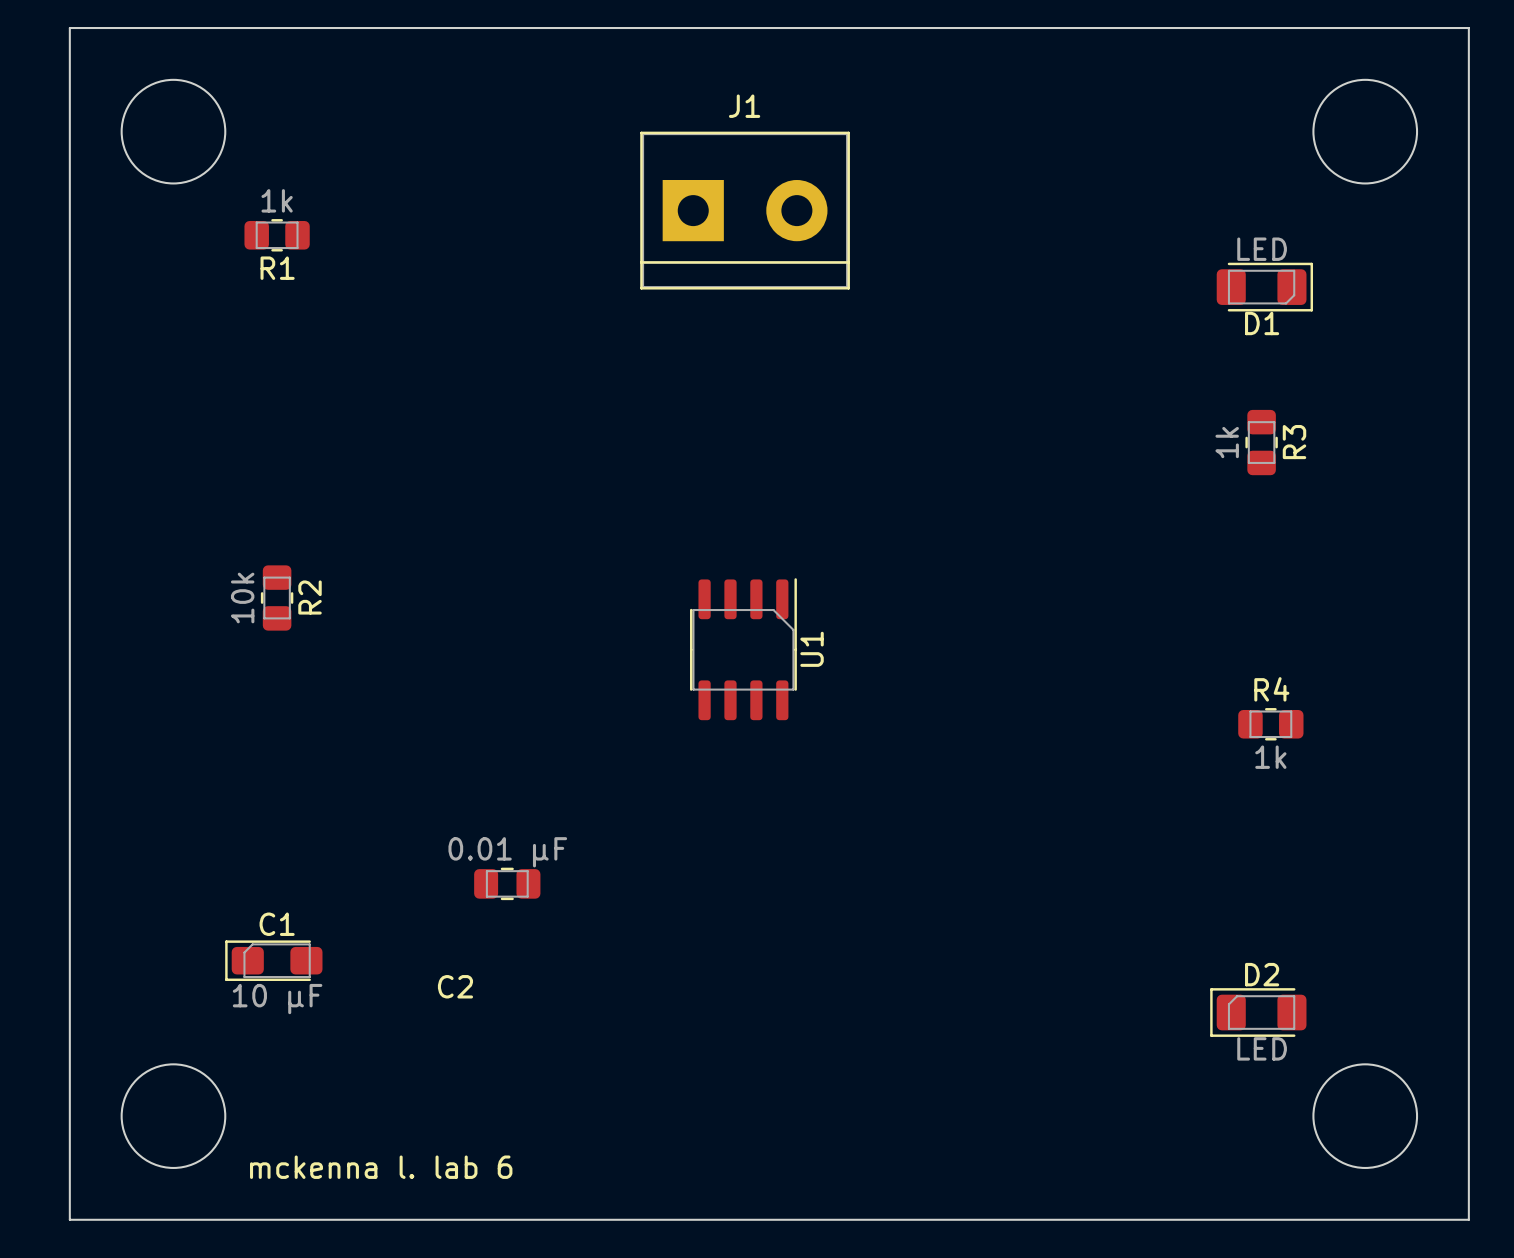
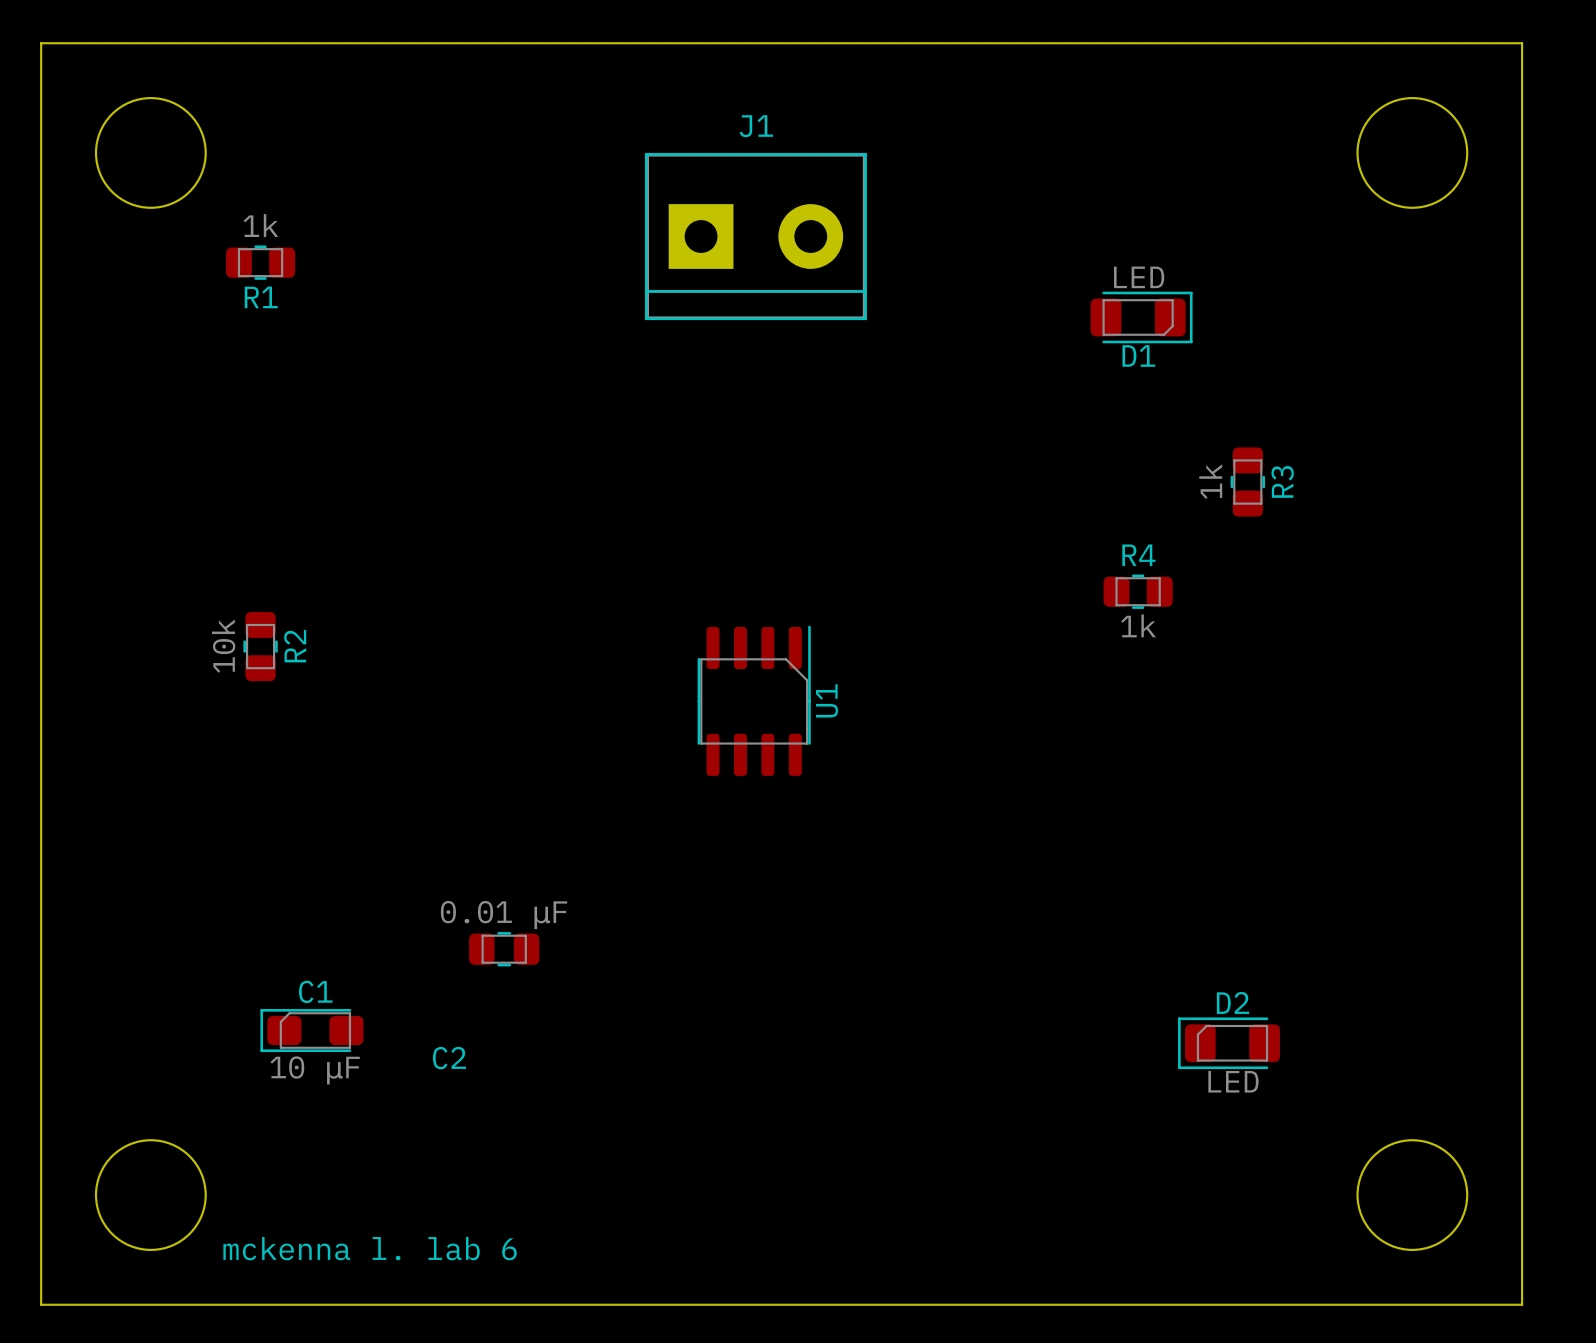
D1 position: (1264, 287) -> (1141, 317)
R3 position: (1261, 442) -> (1247, 482)
R4 position: (1270, 724) -> (1138, 591)
C1 position: (273, 960) -> (311, 1030)
D2 position: (1258, 1012) -> (1229, 1043)

